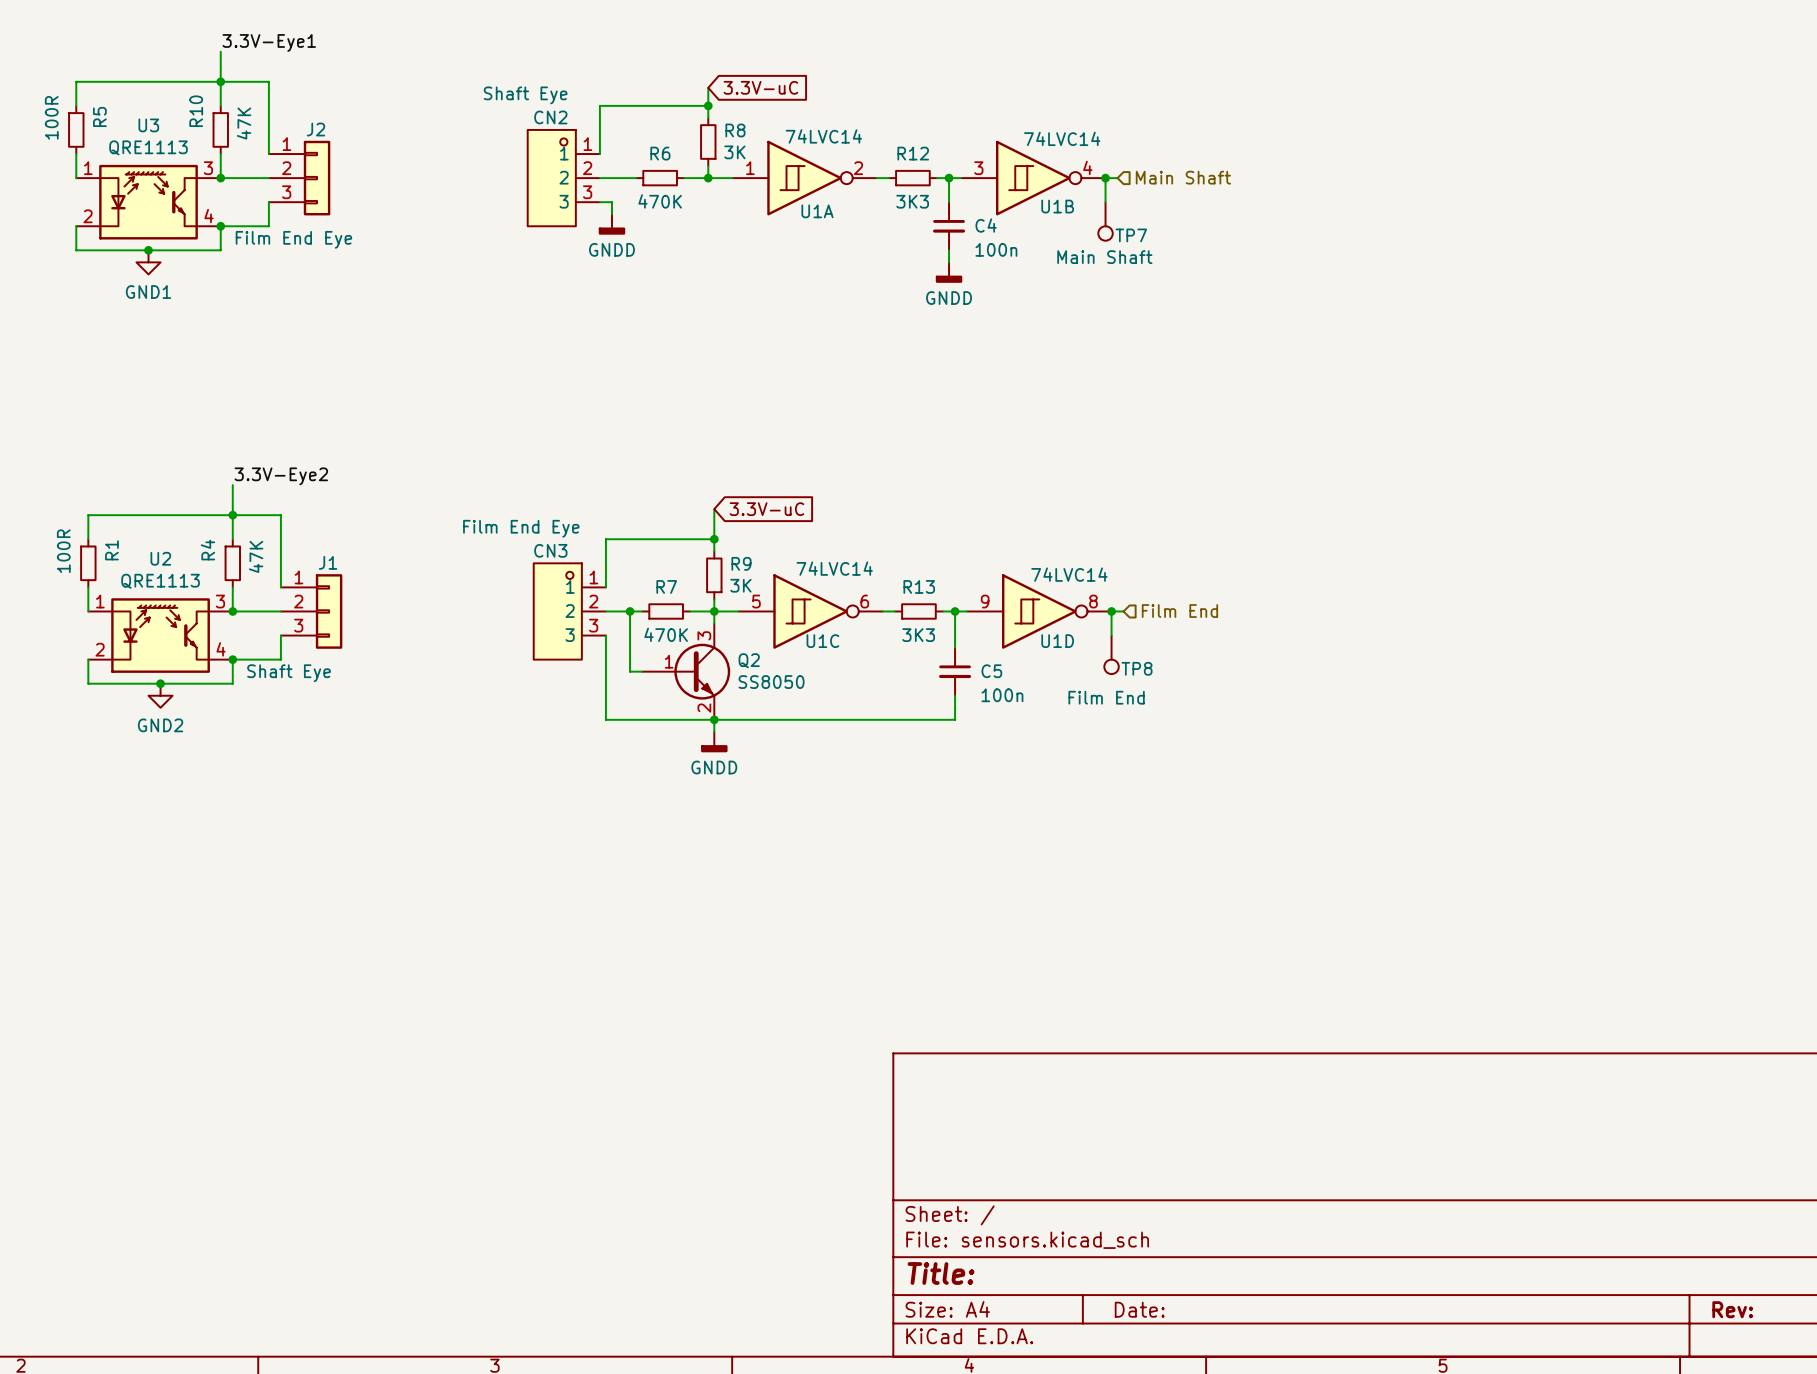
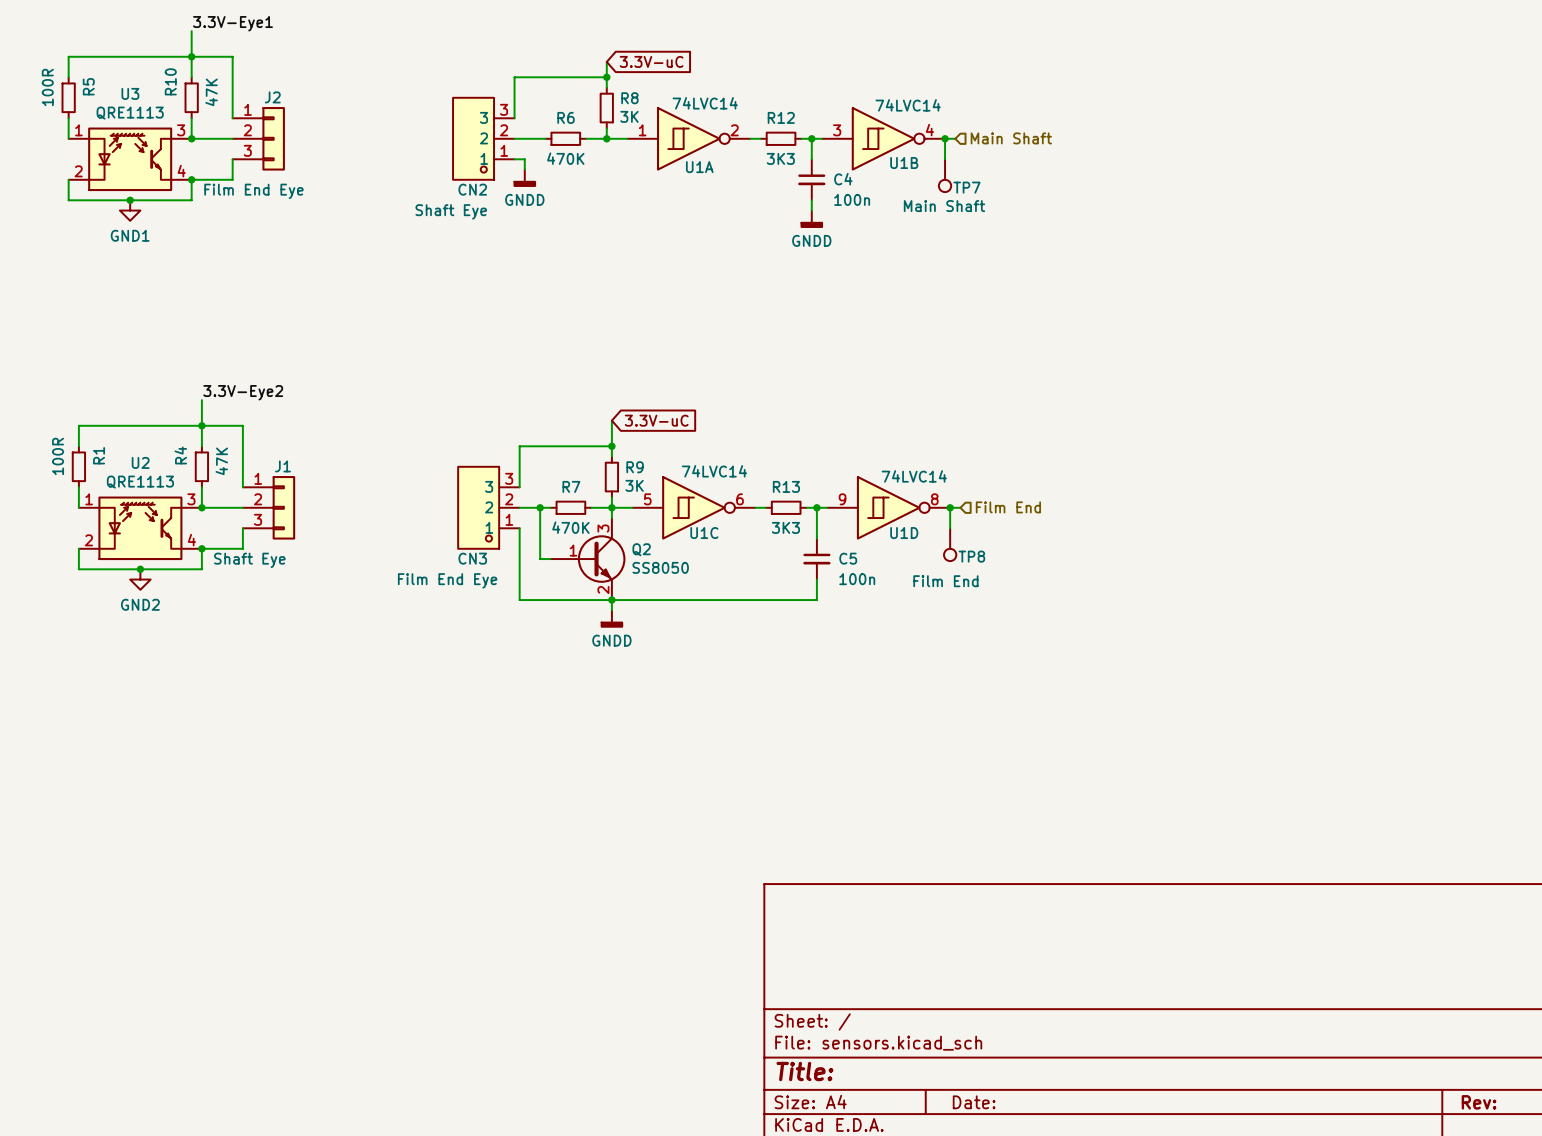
CN2 flip: as is (551, 178) -> up-down (473, 138)
CN3 flip: as is (557, 611) -> up-down (478, 507)

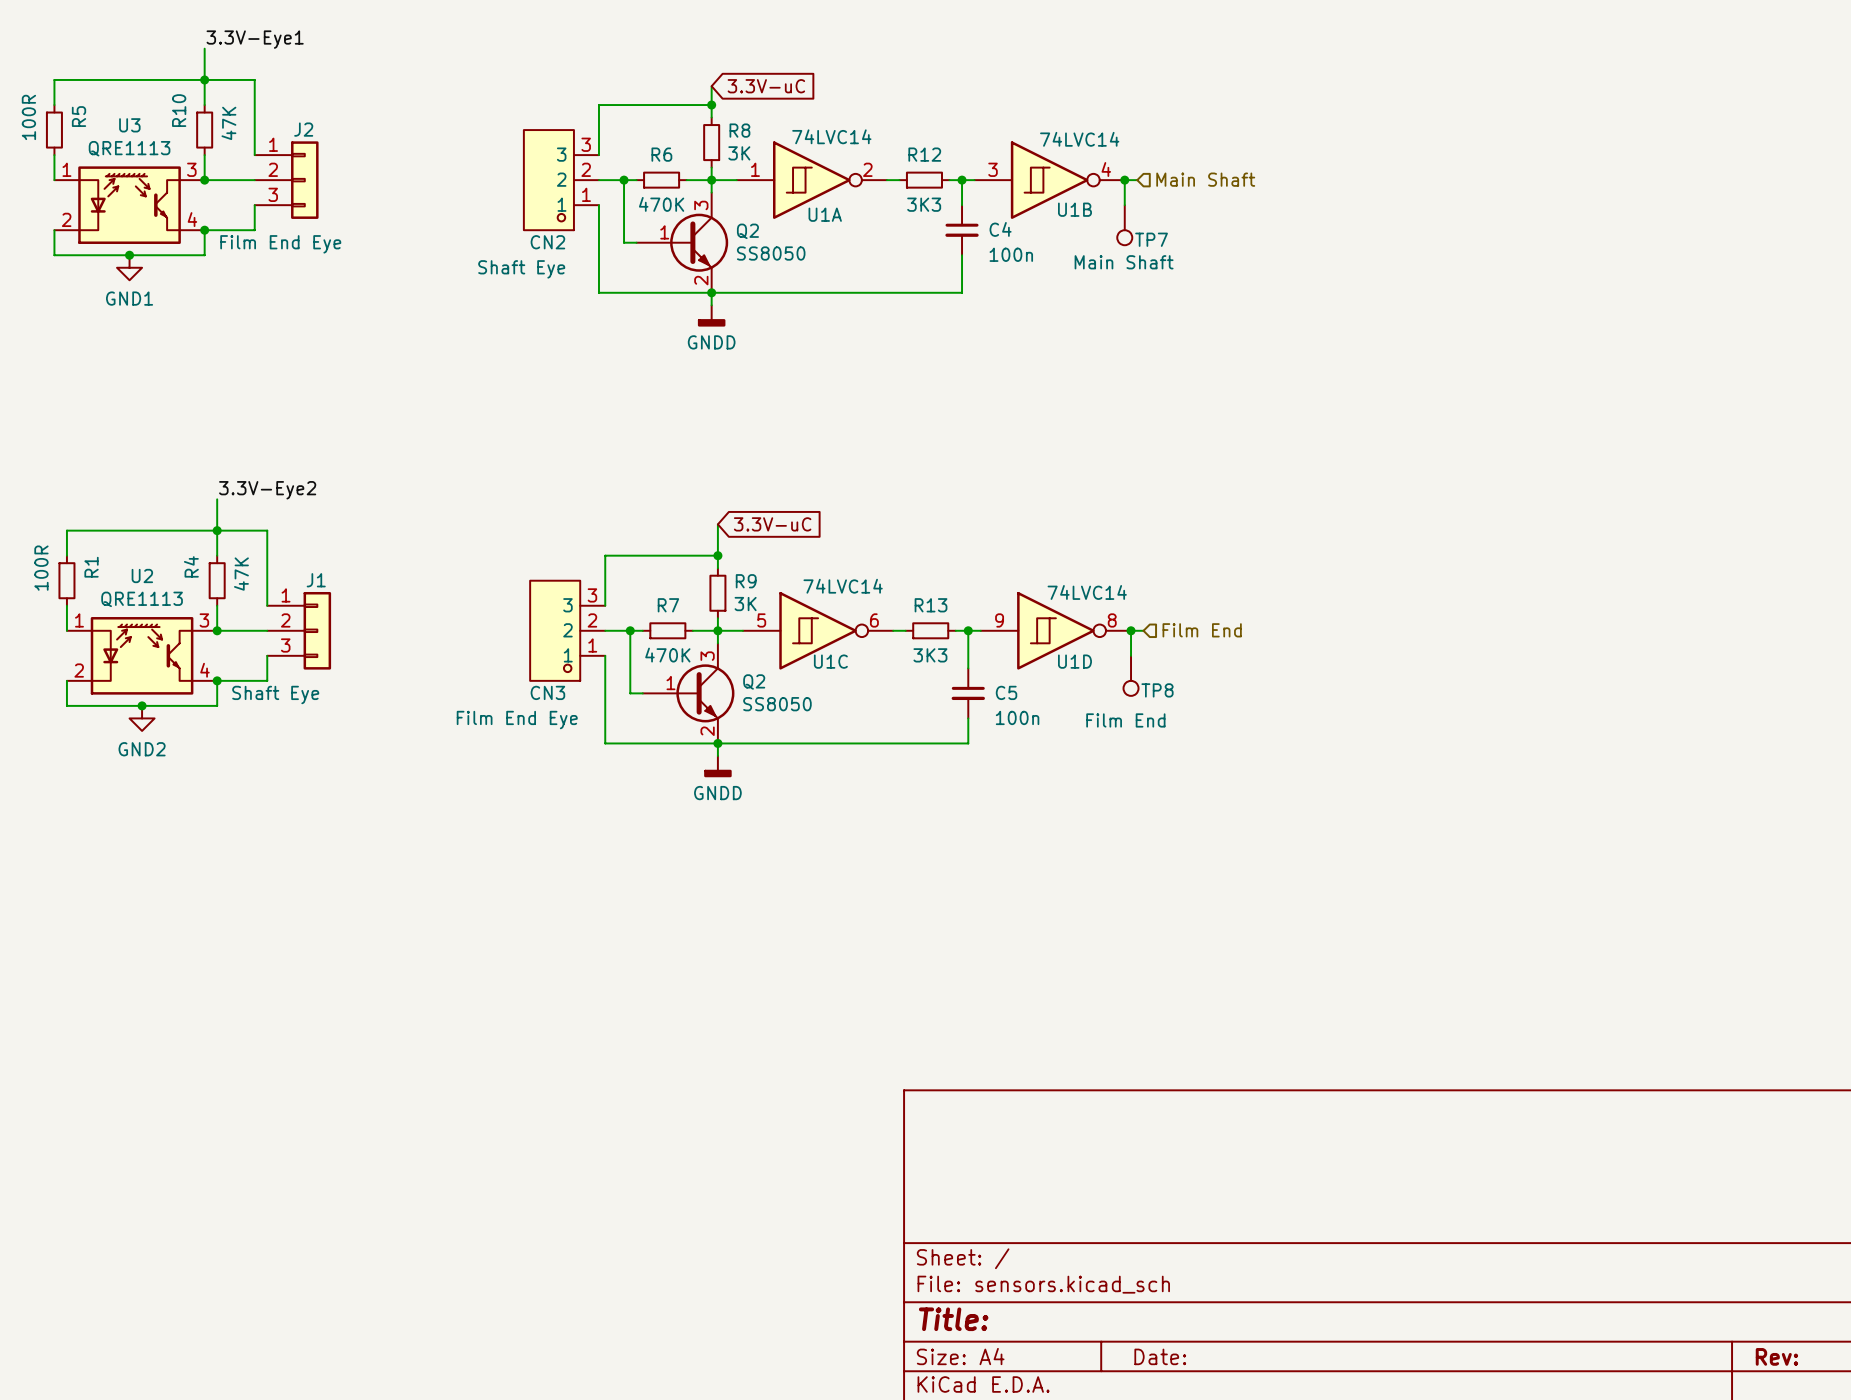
wire: none -> (624, 180) (624, 242) (636, 242)
junction: none -> (624, 180)
wire: none -> (711, 180) (711, 192)
wire: (514, 159) (524, 159) (524, 169) -> (598, 205) (598, 292) (962, 292) (962, 267)
power symbol: GNDD (524, 178) -> none
Q2: none -> SS8050 (682, 242)
power symbol: GNDD (811, 219) -> none
wire: none -> (711, 292) (711, 305)
junction: none -> (711, 292)
power symbol: none -> GNDD (711, 315)

